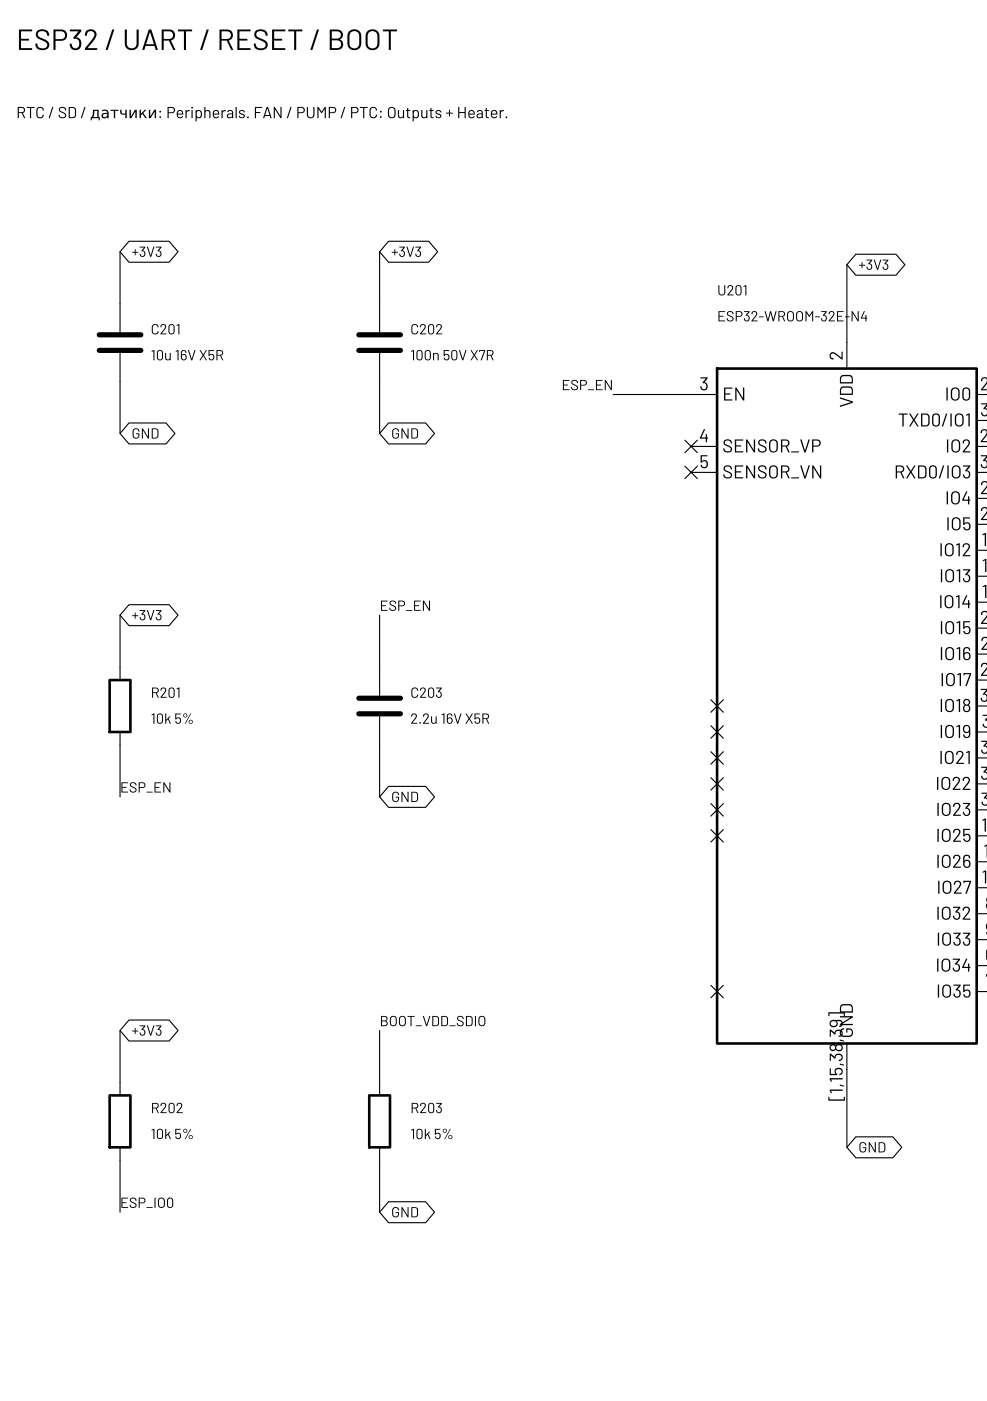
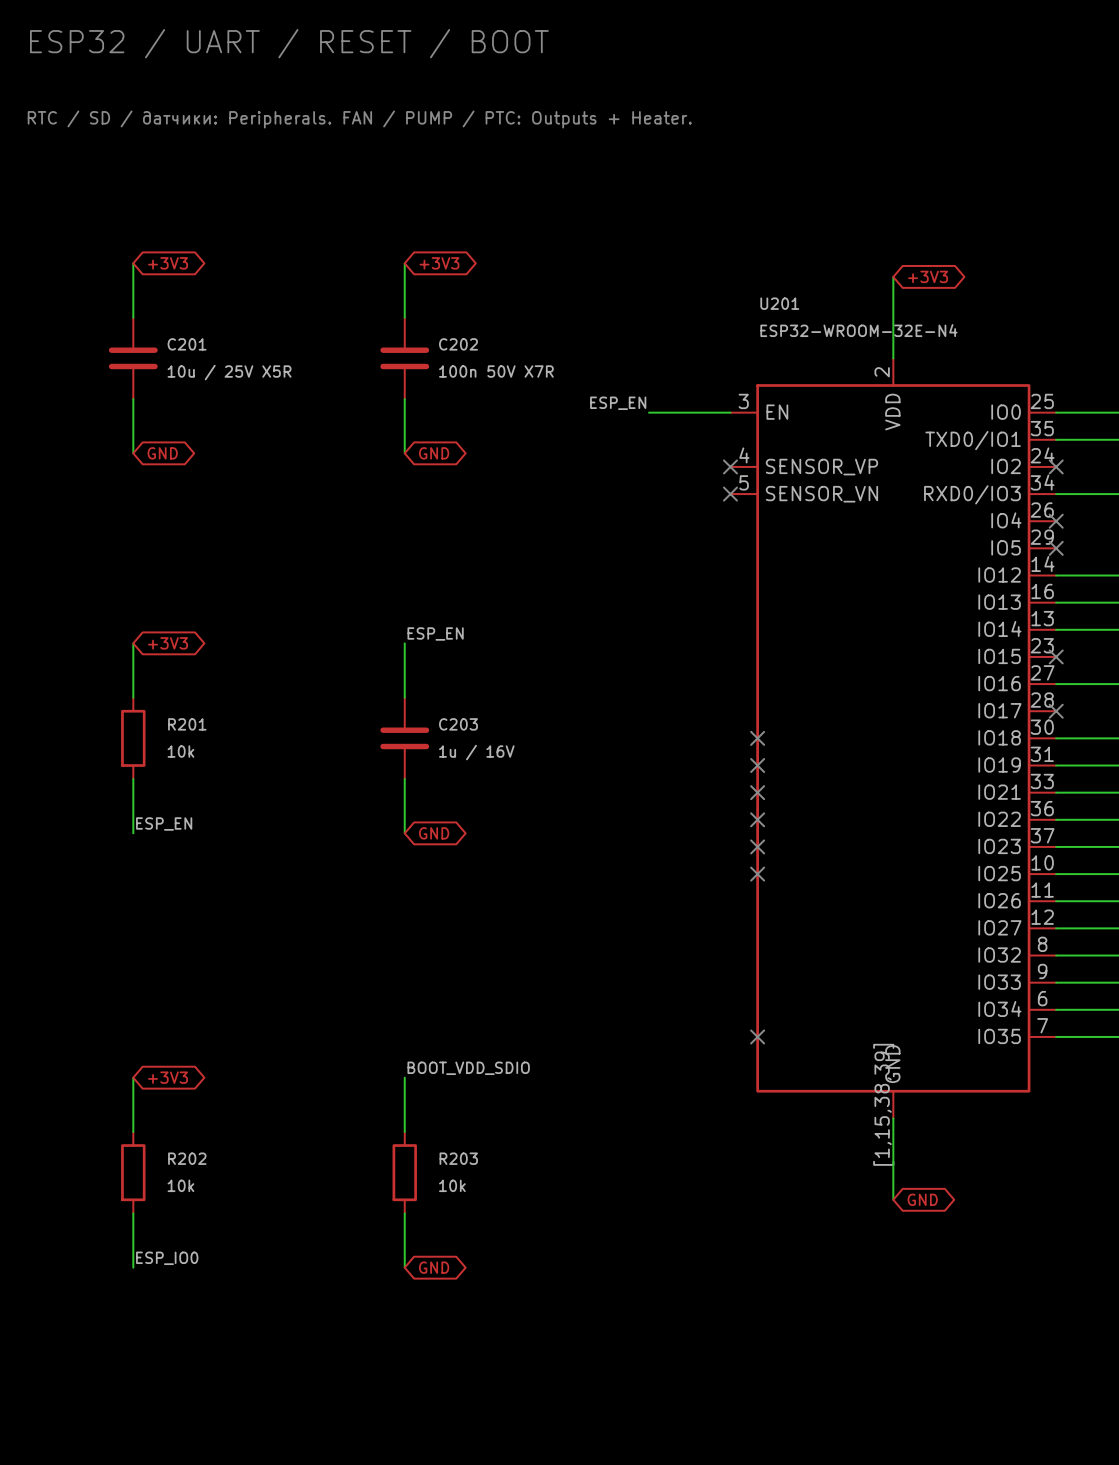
C201 value: 10u 16V X5R (187, 355) -> 10u / 25V X5R (229, 372)
R201 value: 10k 5% (172, 718) -> 10k (180, 751)
C203 value: 2.2u 16V X5R (450, 718) -> 1u / 16V (476, 752)
R202 value: 10k 5% (172, 1133) -> 10k (180, 1185)
R203 value: 10k 5% (431, 1133) -> 10k (452, 1185)

